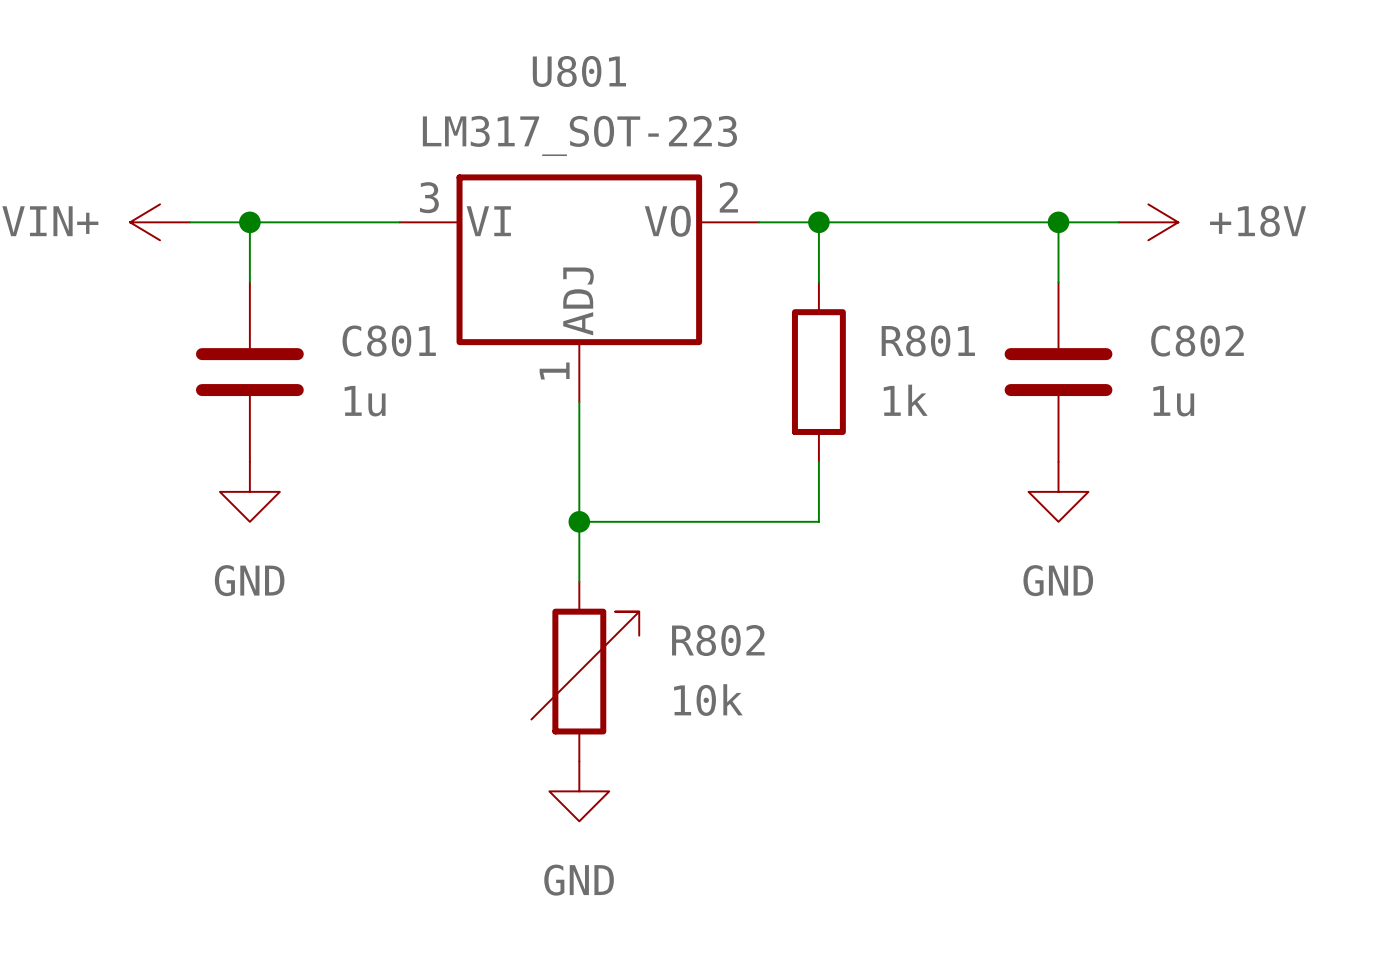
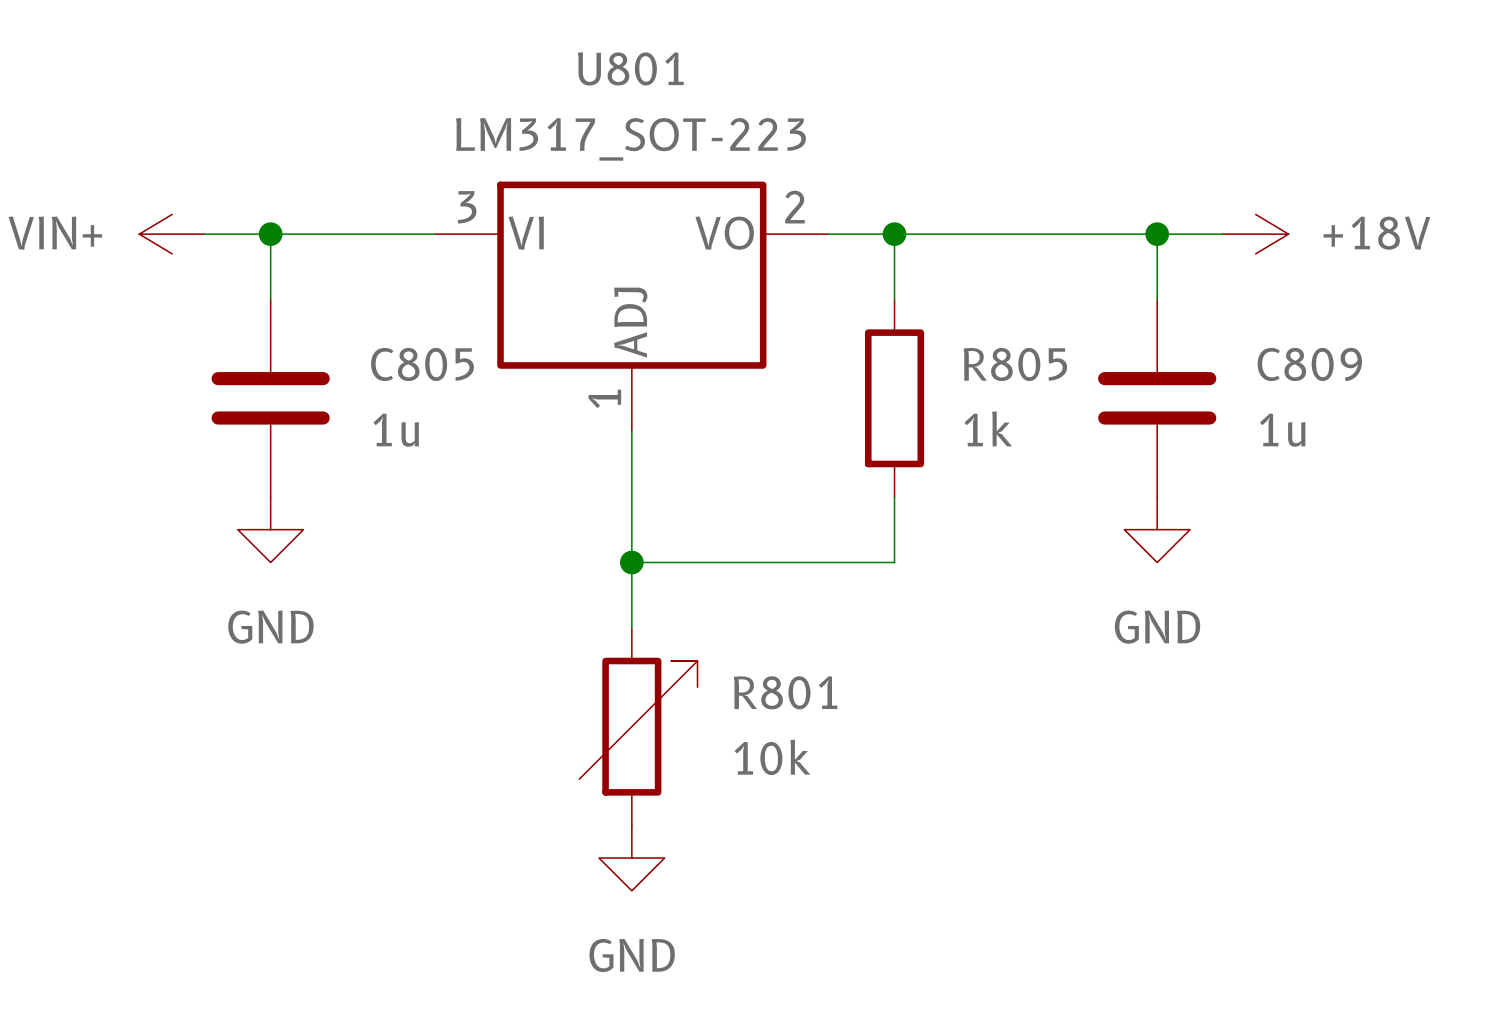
C801 name: C801 (389, 341) -> C805 (422, 364)
R801 name: R801 (928, 341) -> R805 (1015, 364)
C802 name: C802 (1197, 341) -> C809 (1309, 364)
R802 name: R802 (718, 640) -> R801 (785, 692)

